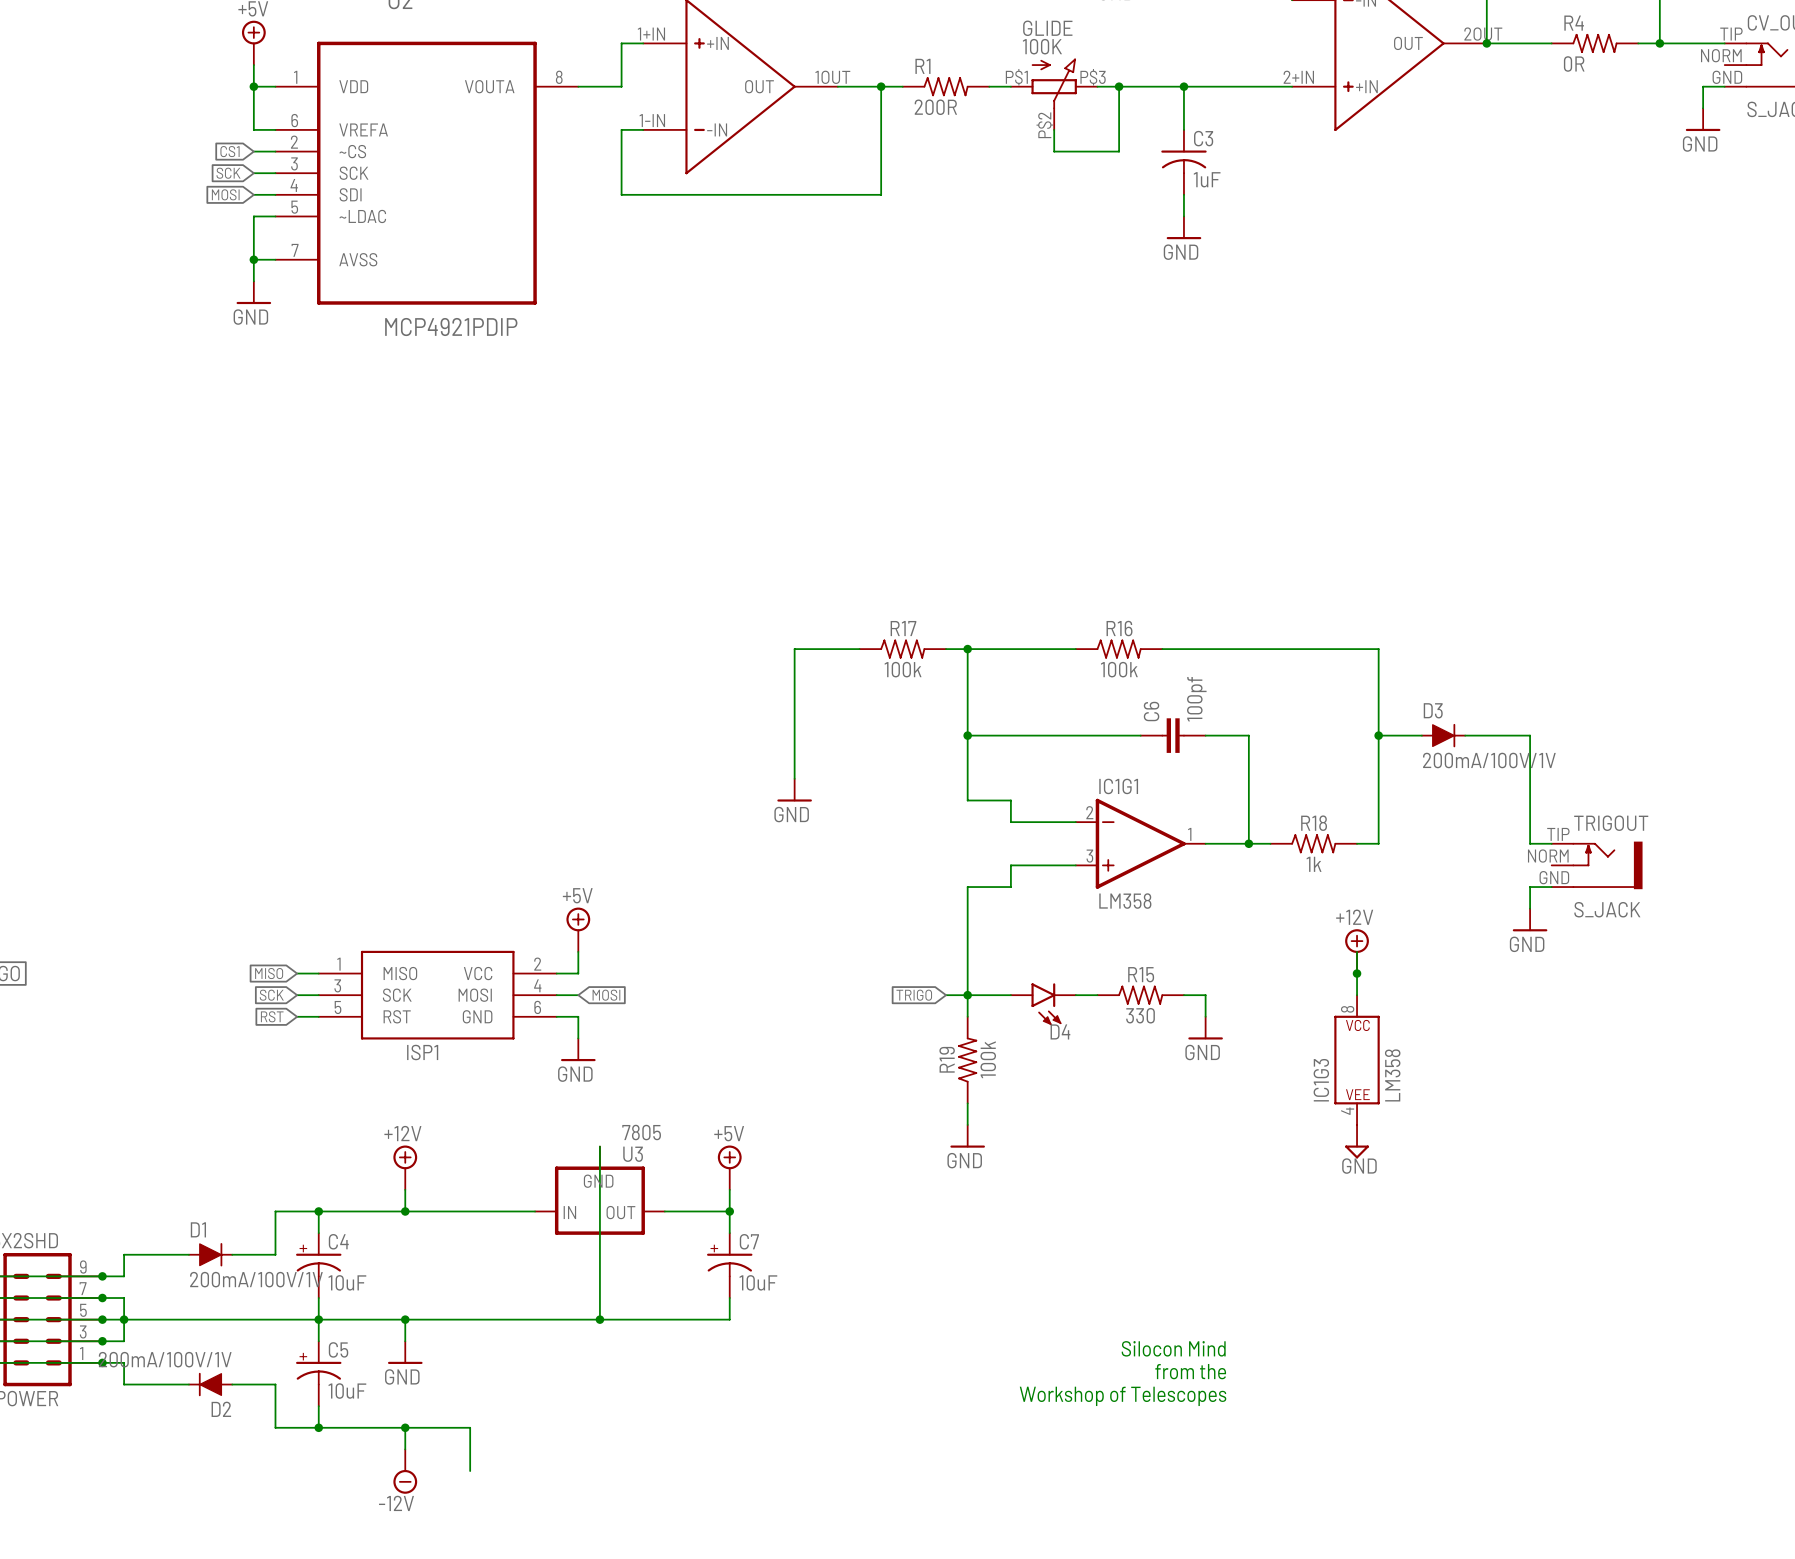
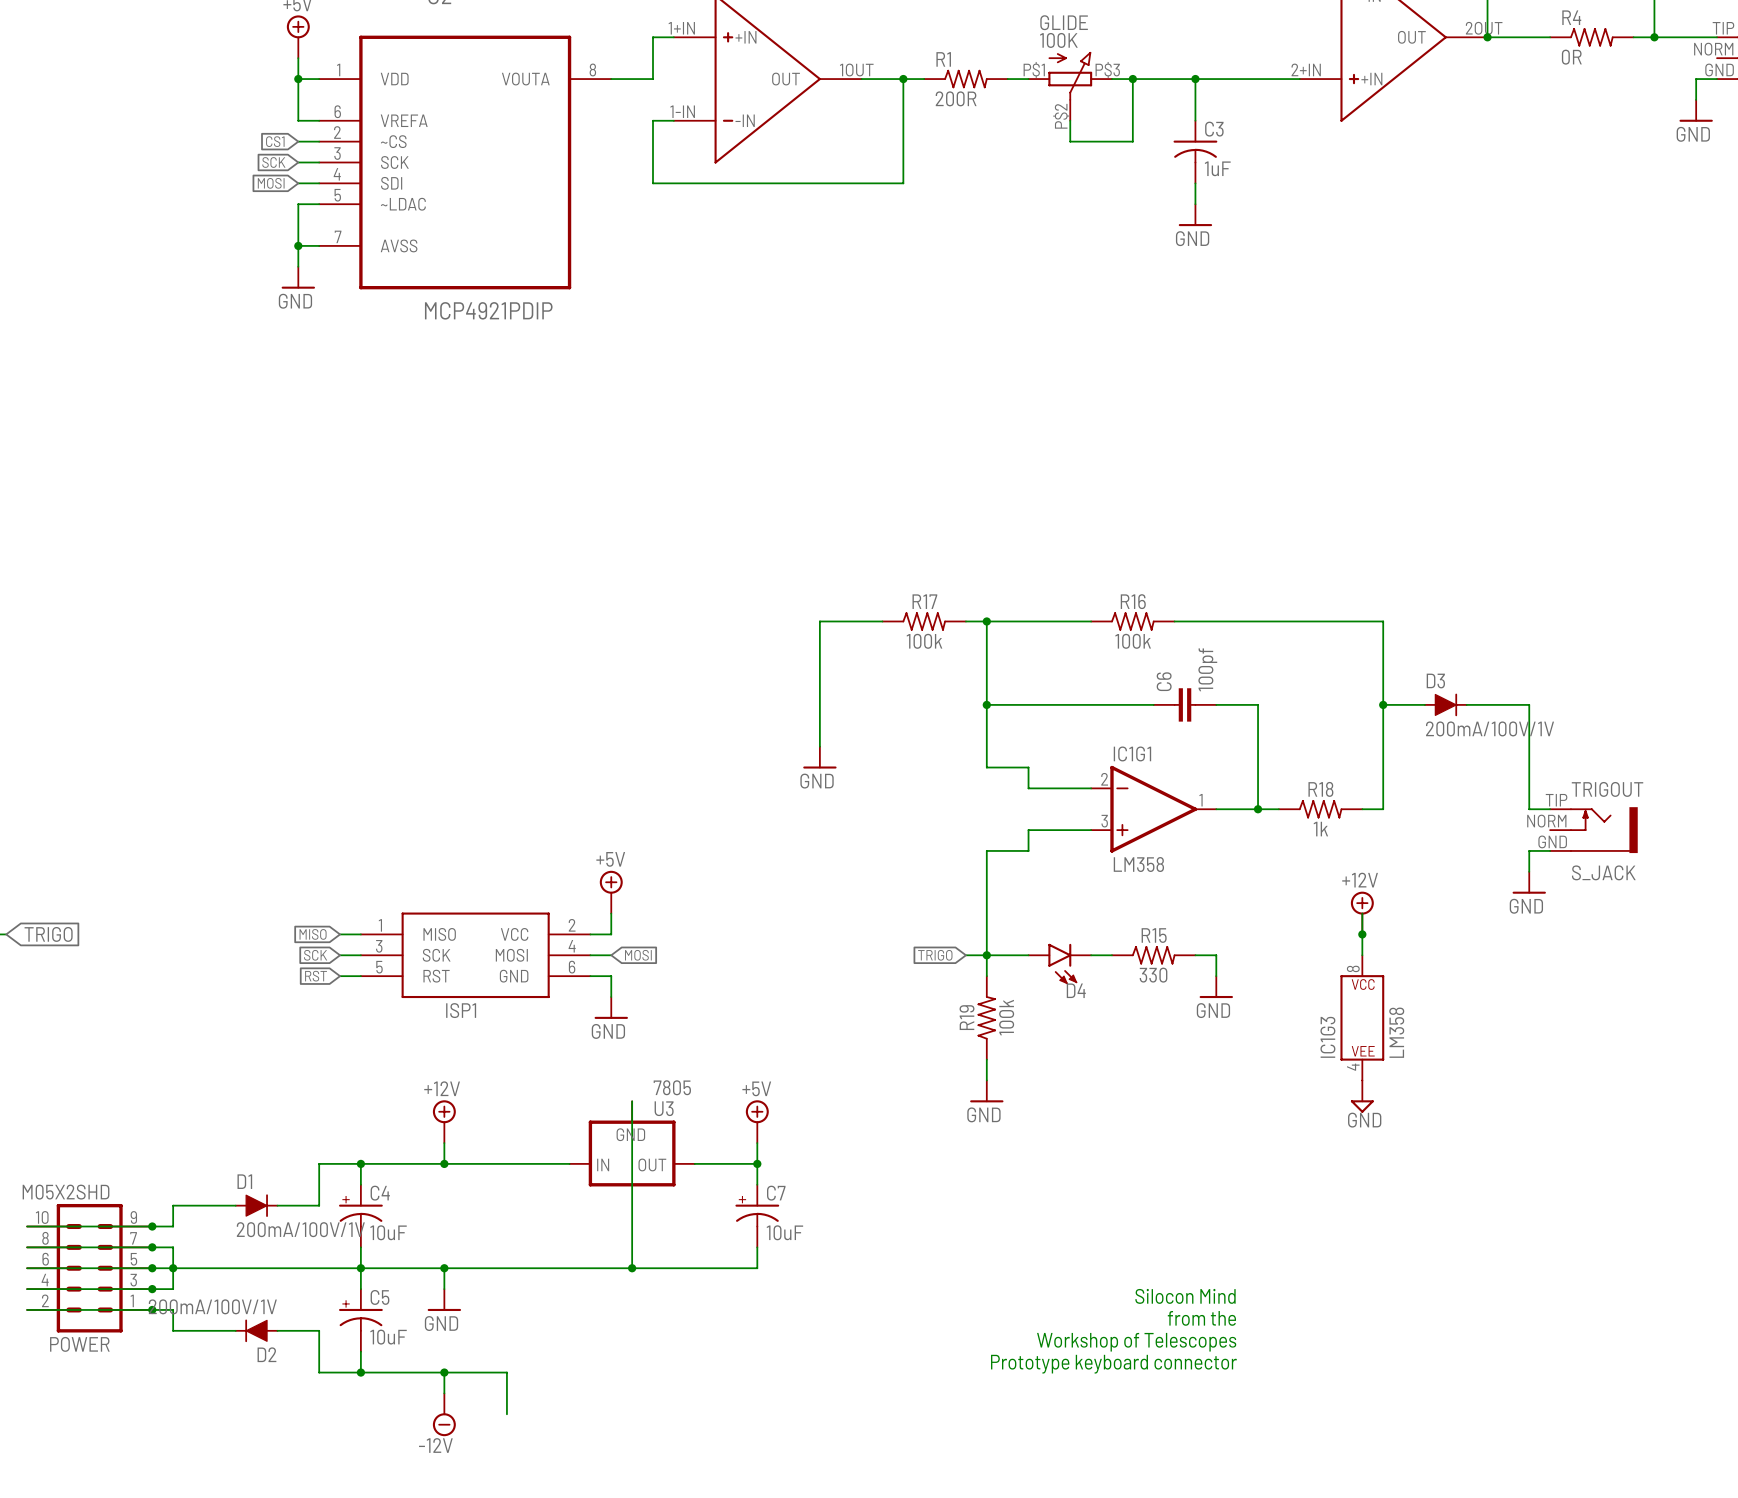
text: none -> Prototype keyboard connector (1113, 1364)

